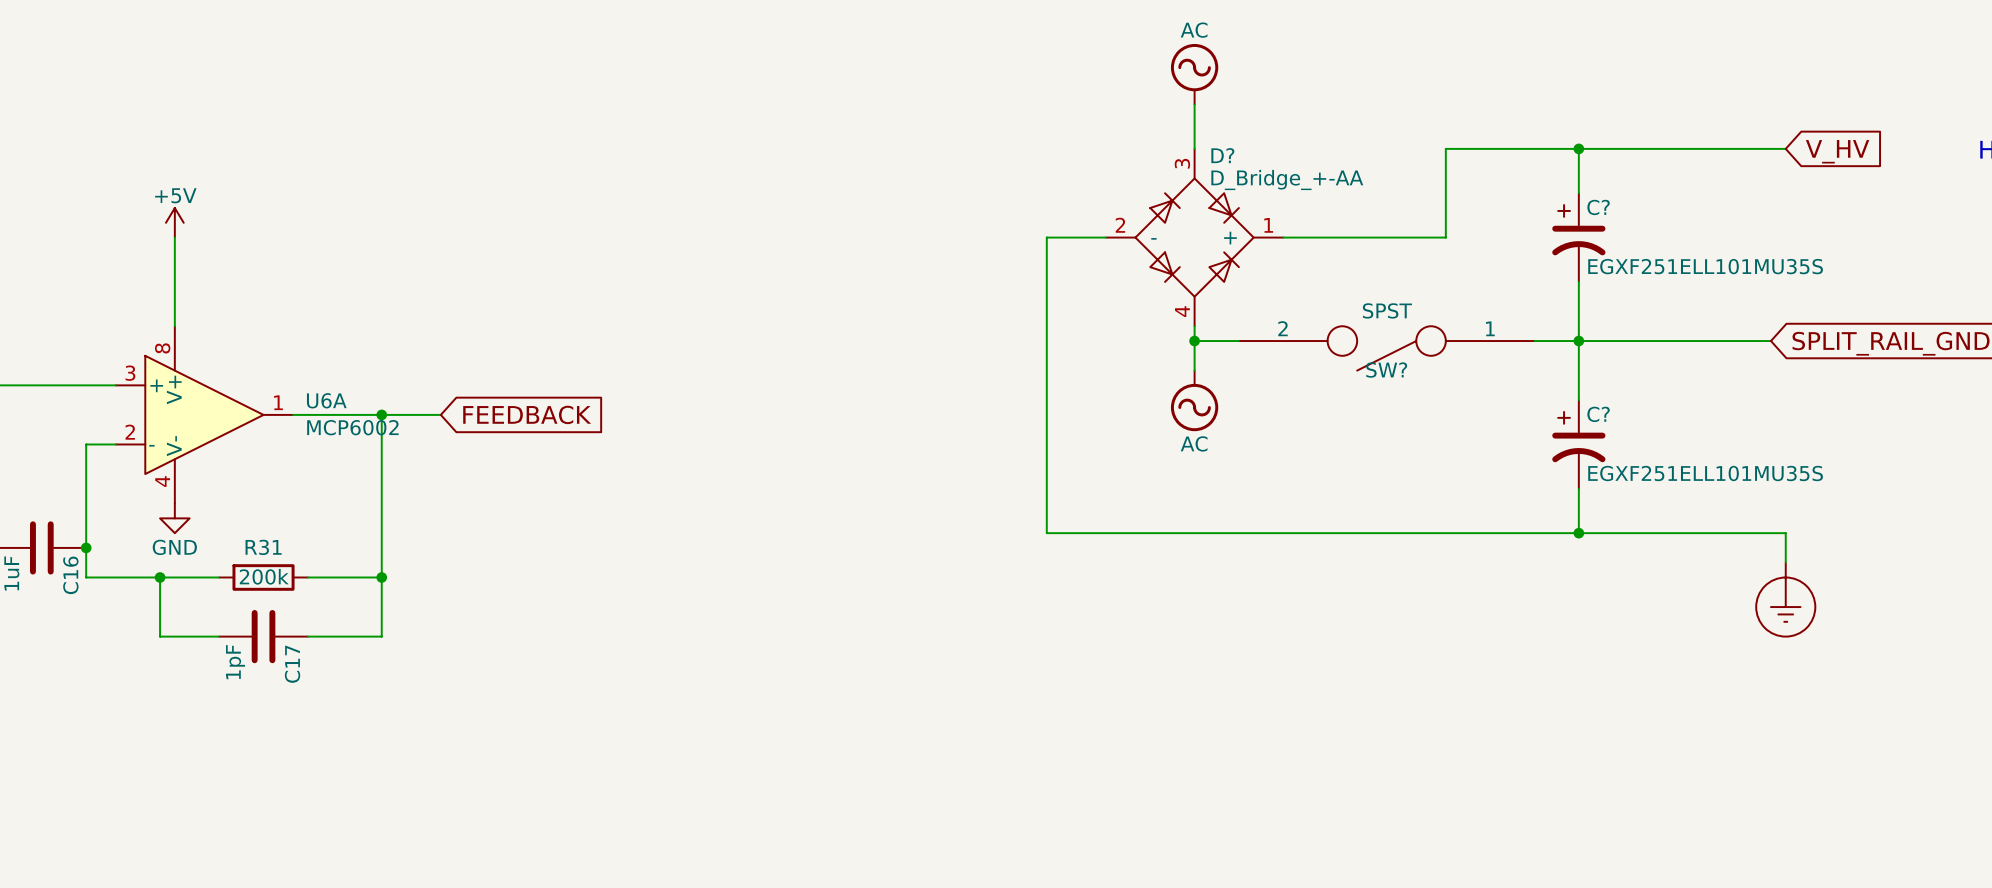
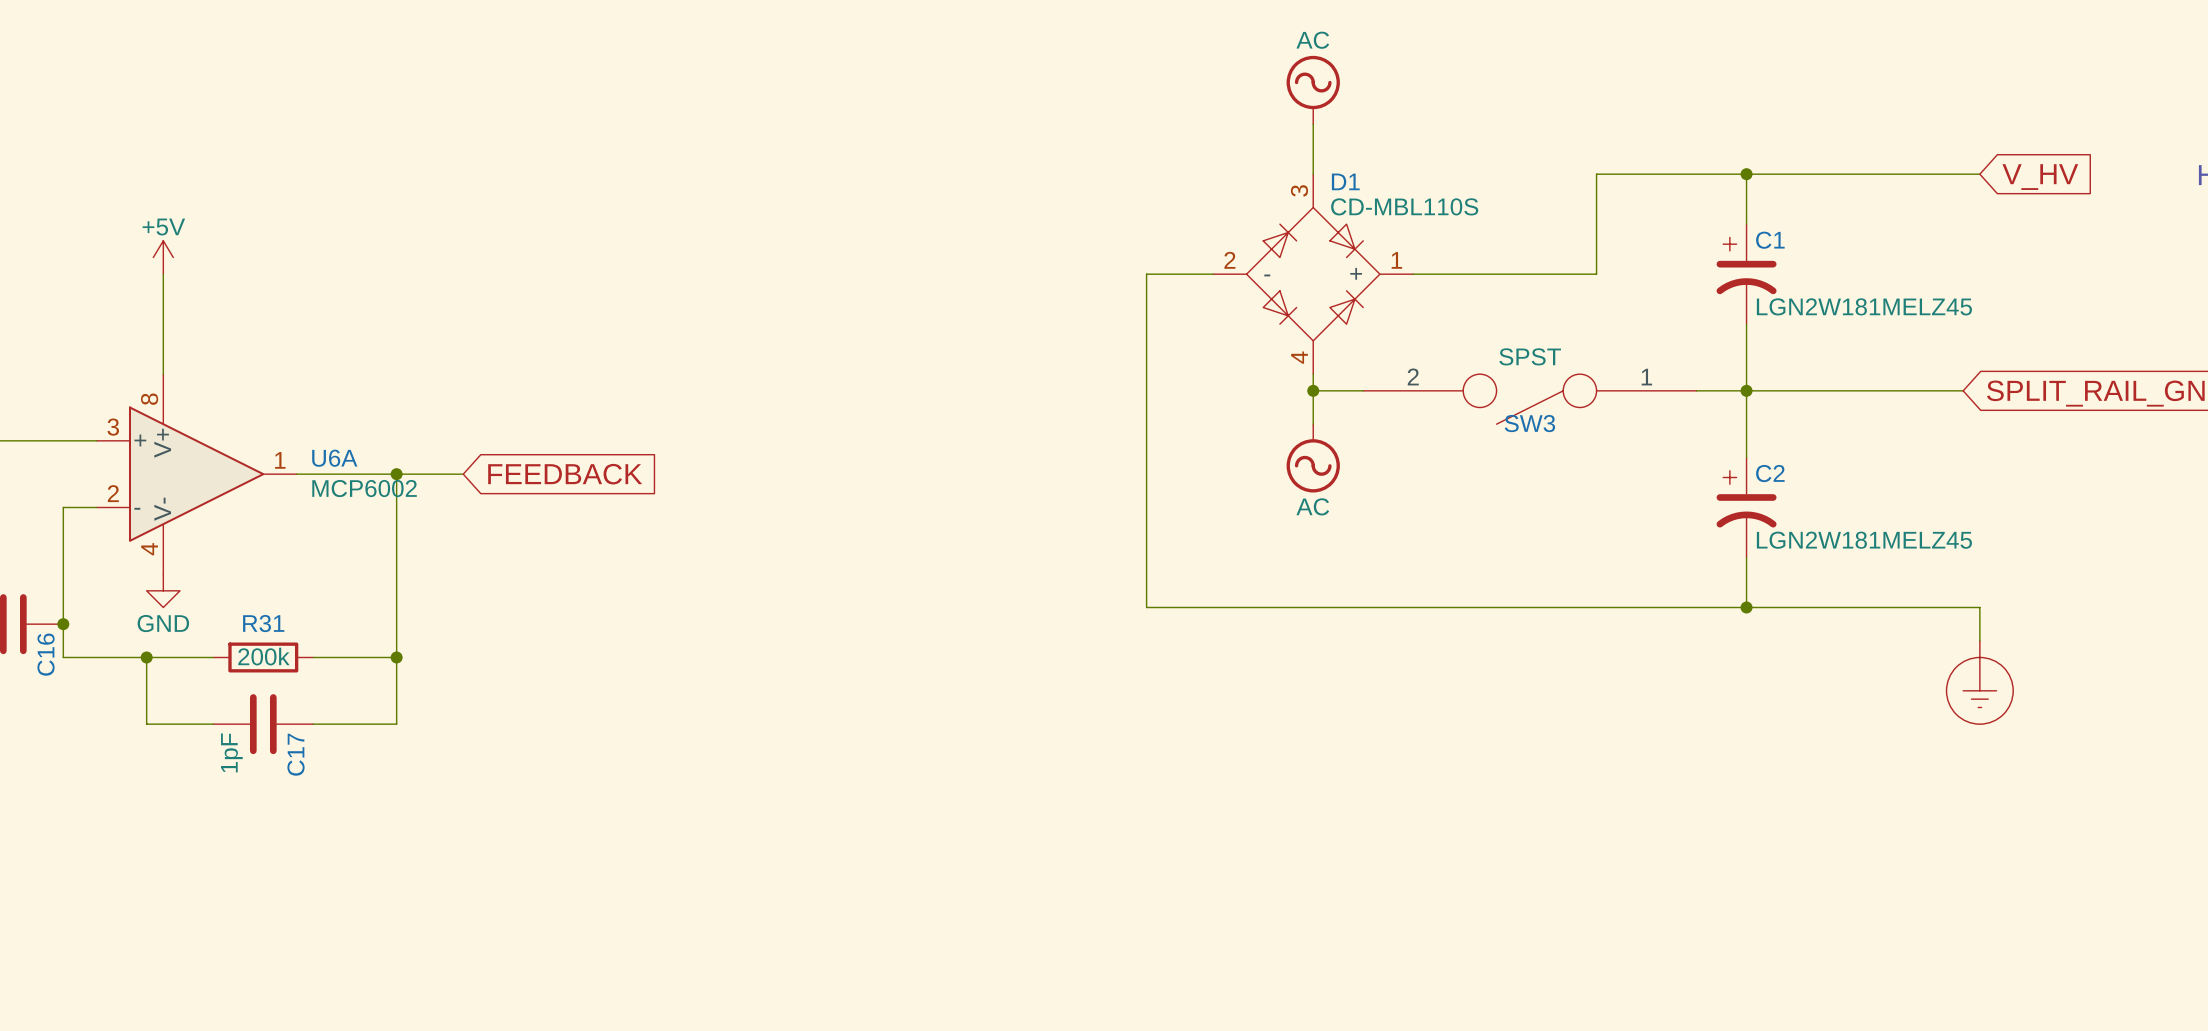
D? name: D? (1222, 155) -> D1 (1345, 181)
D? value: D_Bridge_+-AA (1287, 179) -> CD-MBL110S (1404, 206)
C? name: C? (1598, 207) -> C1 (1770, 240)
C? value: EGXF251ELL101MU35S (1705, 266) -> LGN2W181MELZ45 (1864, 306)
SW? name: SW? (1386, 370) -> SW3 (1529, 423)
C? name: C? (1598, 414) -> C2 (1770, 473)
C? value: EGXF251ELL101MU35S (1705, 473) -> LGN2W181MELZ45 (1864, 540)

